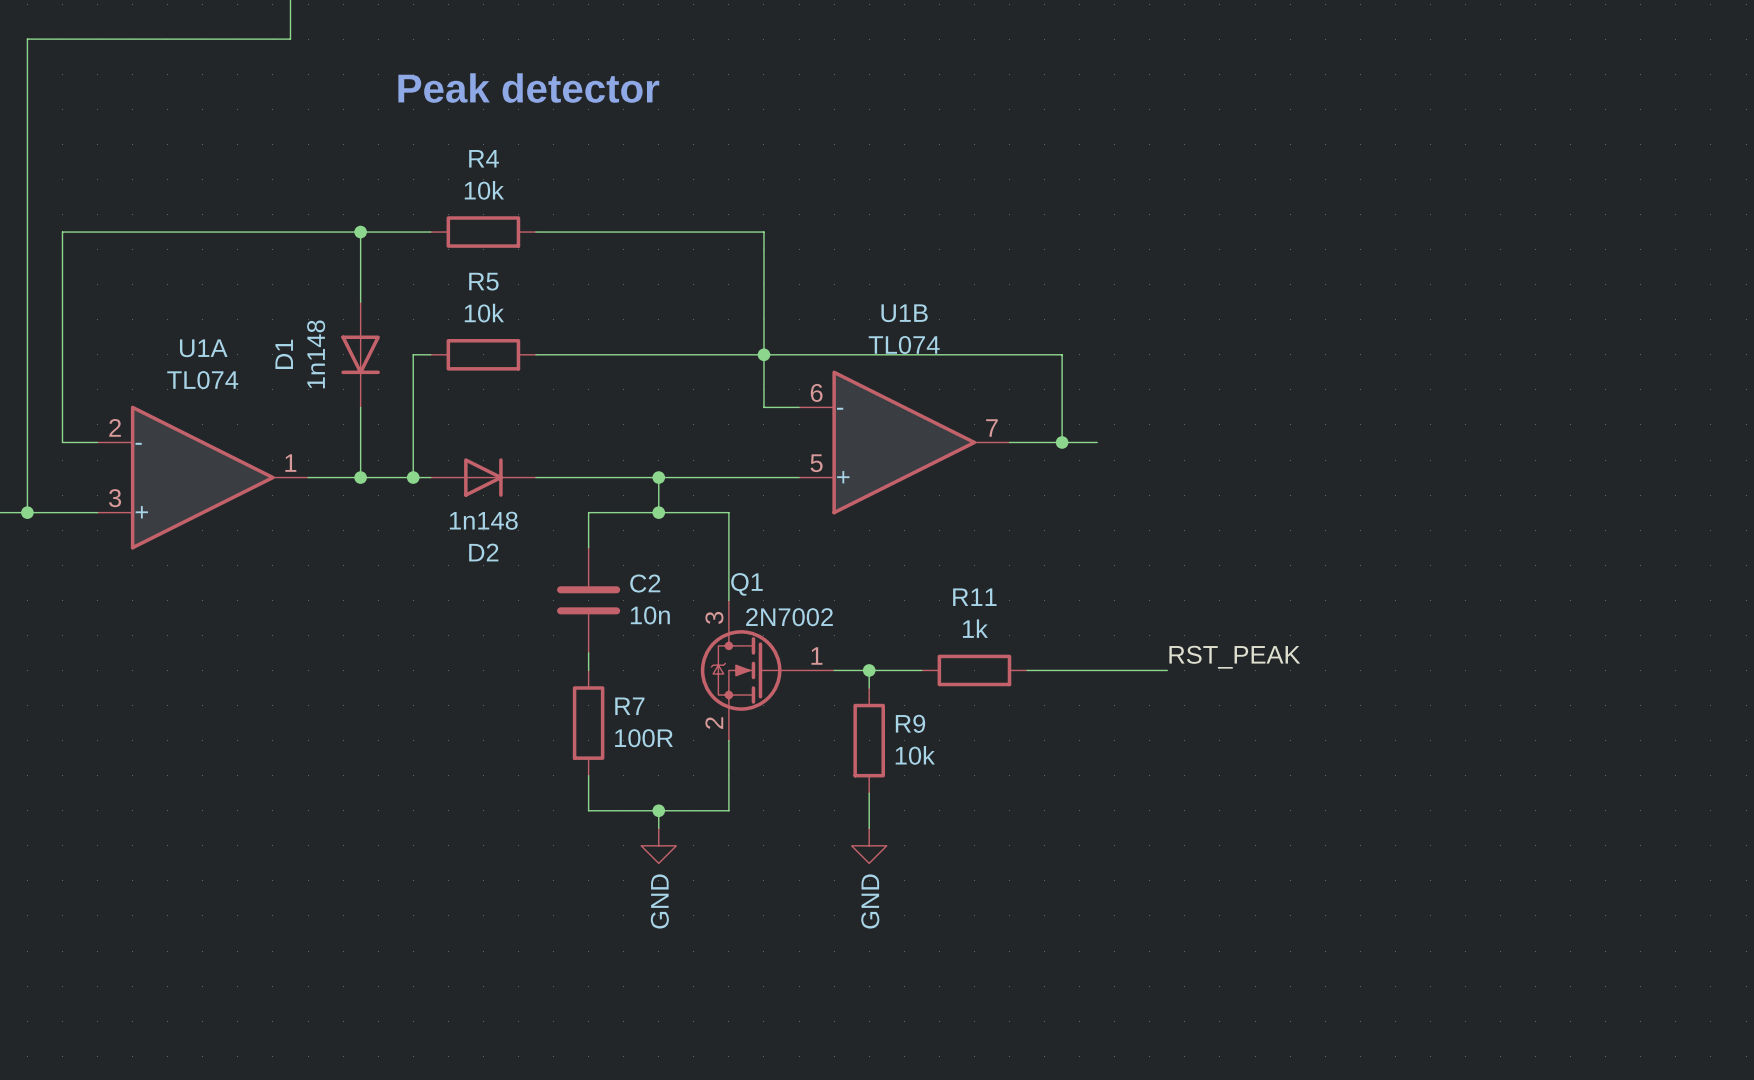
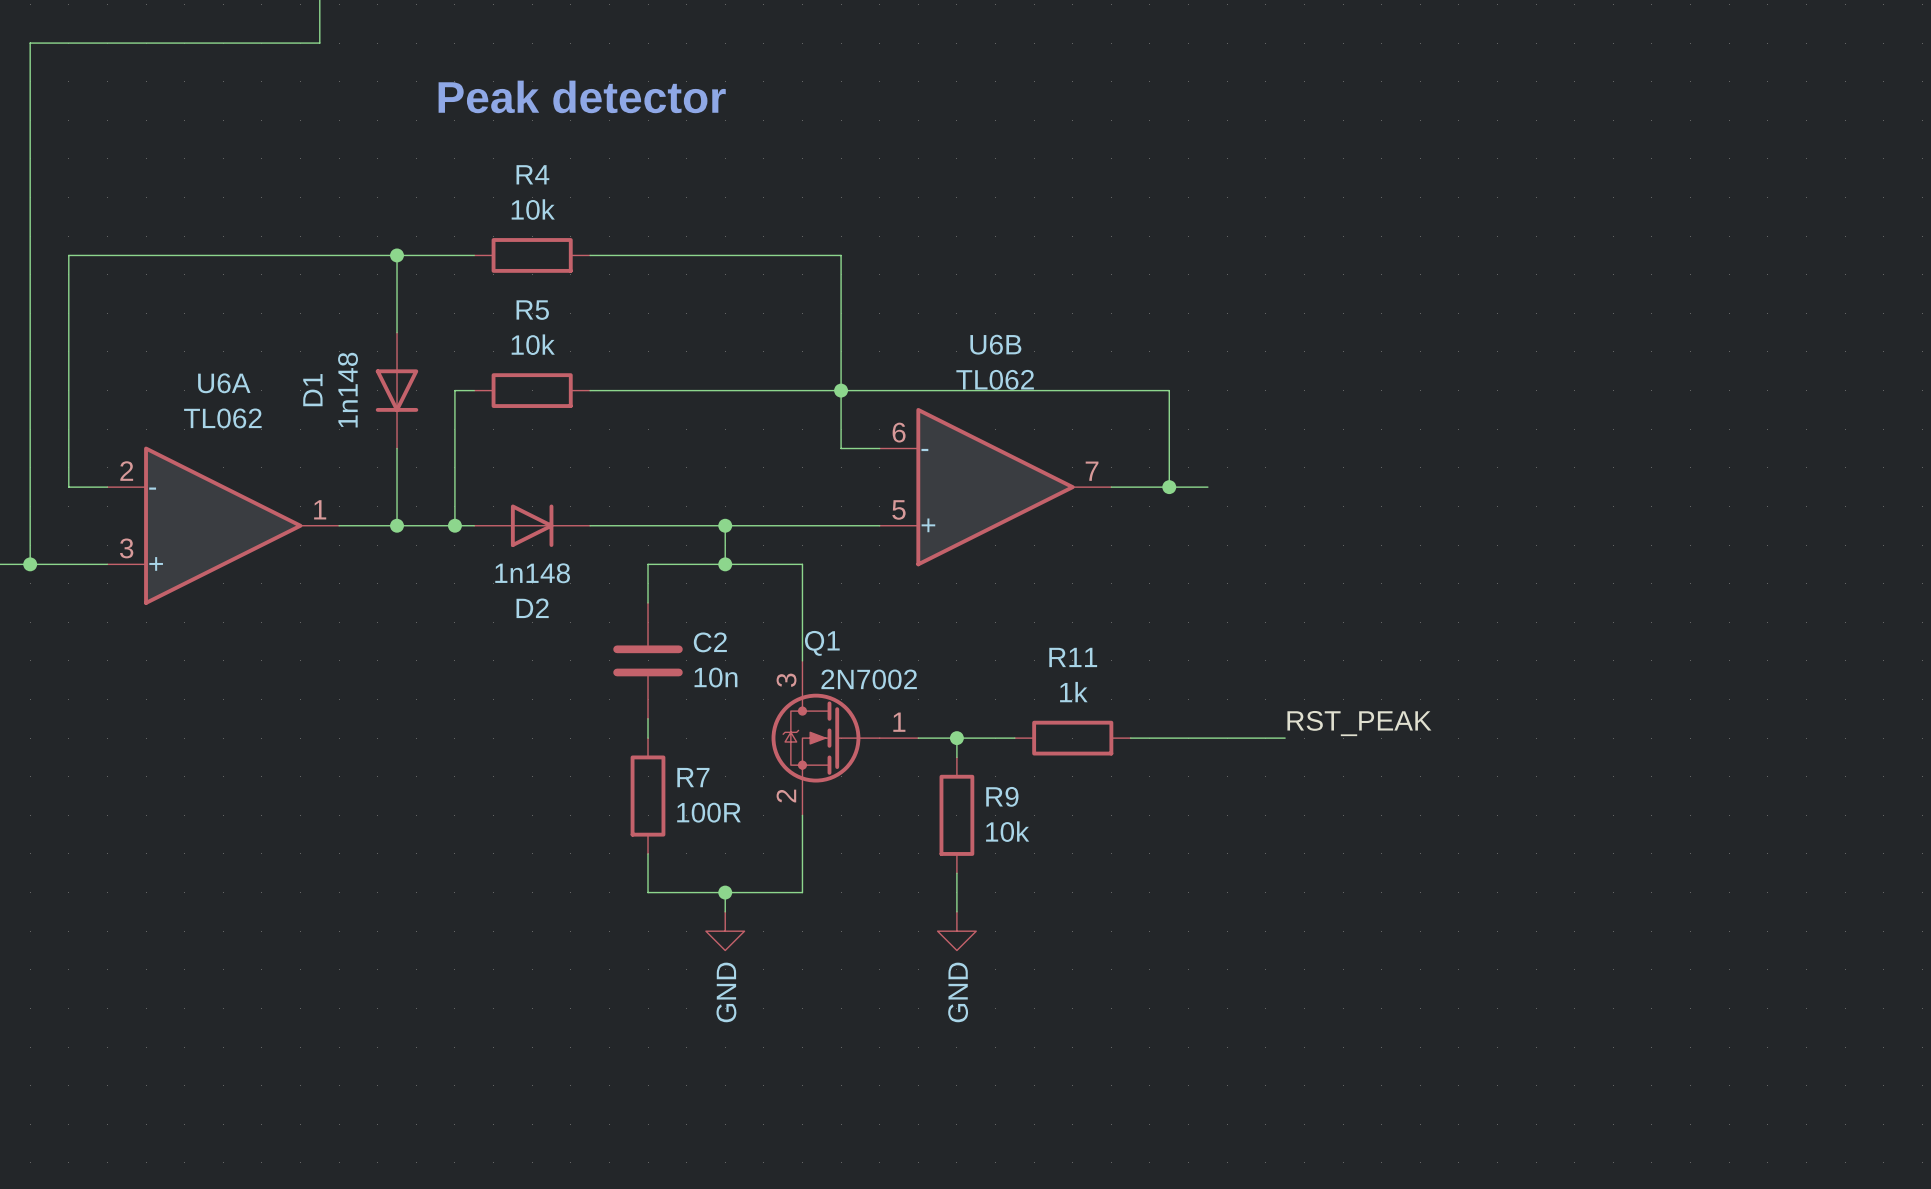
U1B name: U1B (904, 313) -> U6B (995, 344)
U1B value: TL074 (904, 345) -> TL062 (995, 379)
U1A name: U1A (203, 348) -> U6A (224, 383)
U1A value: TL074 (202, 380) -> TL062 (222, 418)

